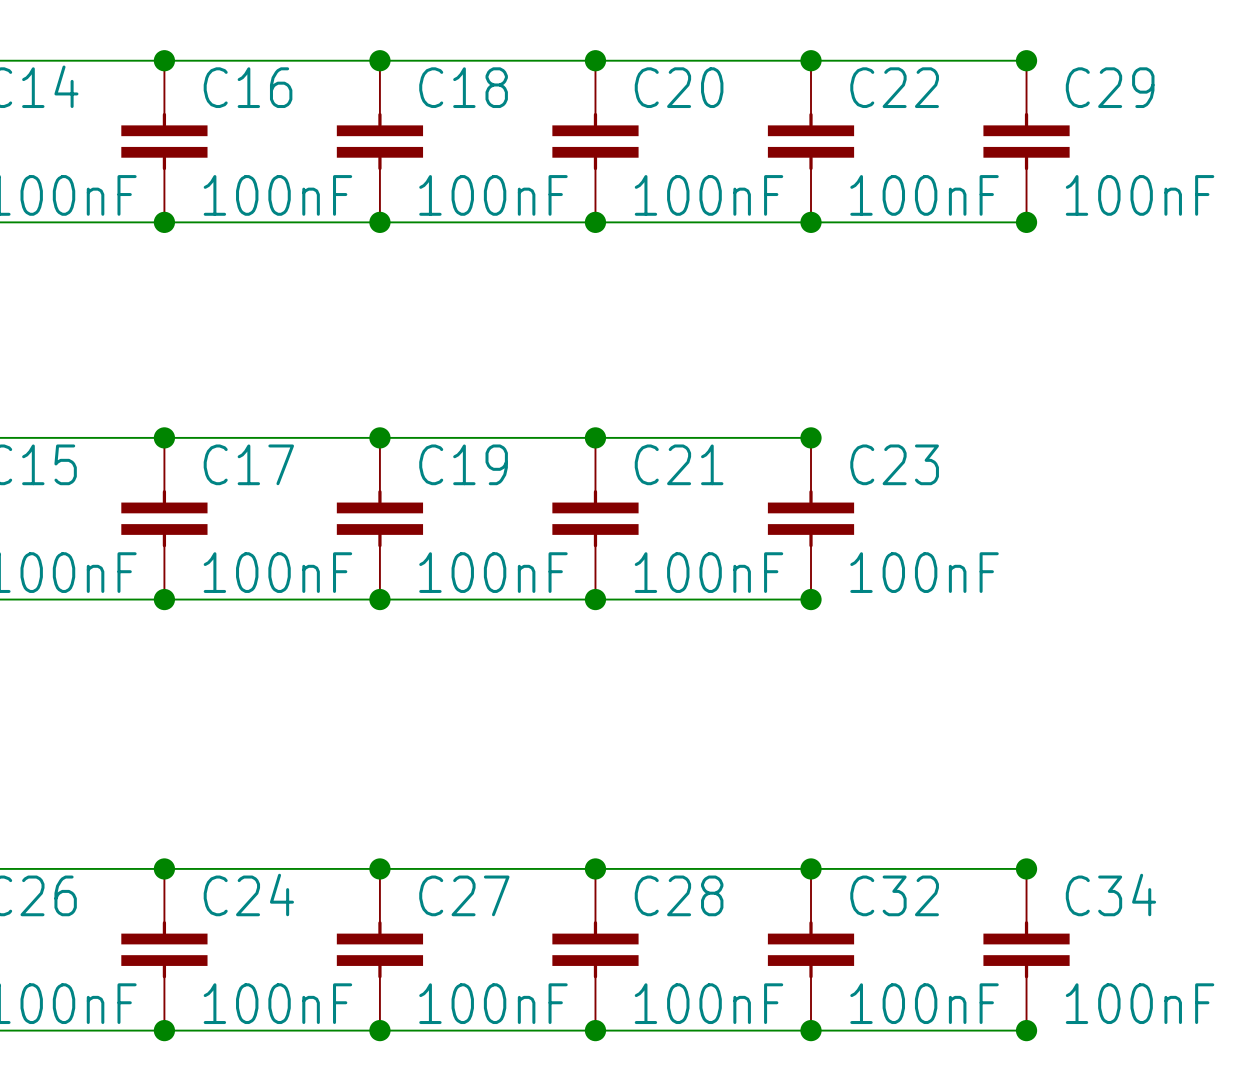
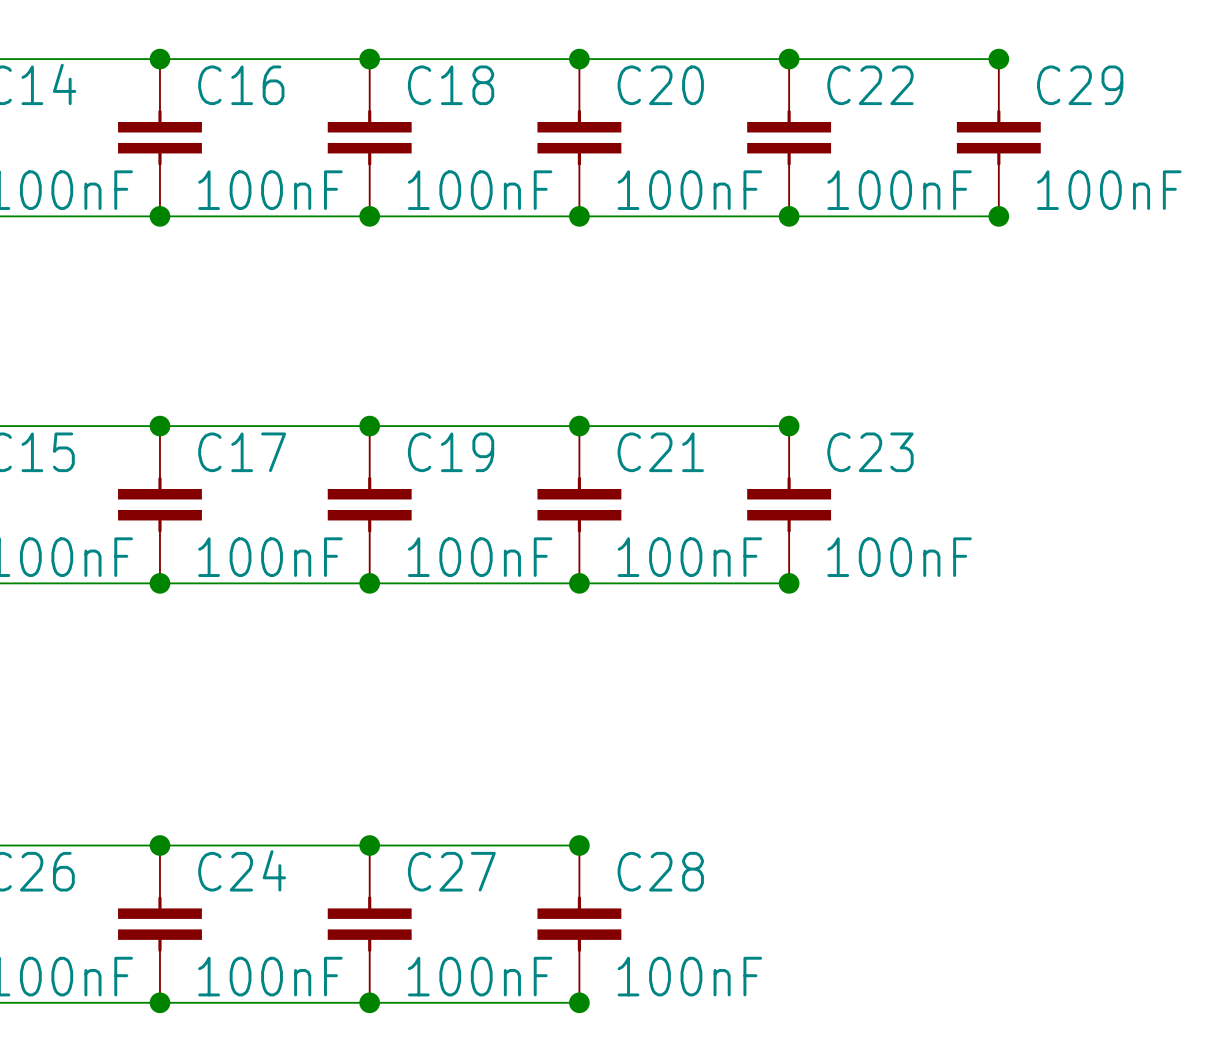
wire: (595, 868) (1026, 868) -> none
junction: (811, 868) -> none
junction: (1026, 868) -> none
C32: 100nF (811, 949) -> none
C34: 100nF (1026, 949) -> none
wire: (595, 1030) (1026, 1030) -> none
junction: (811, 1030) -> none
junction: (1026, 1030) -> none

